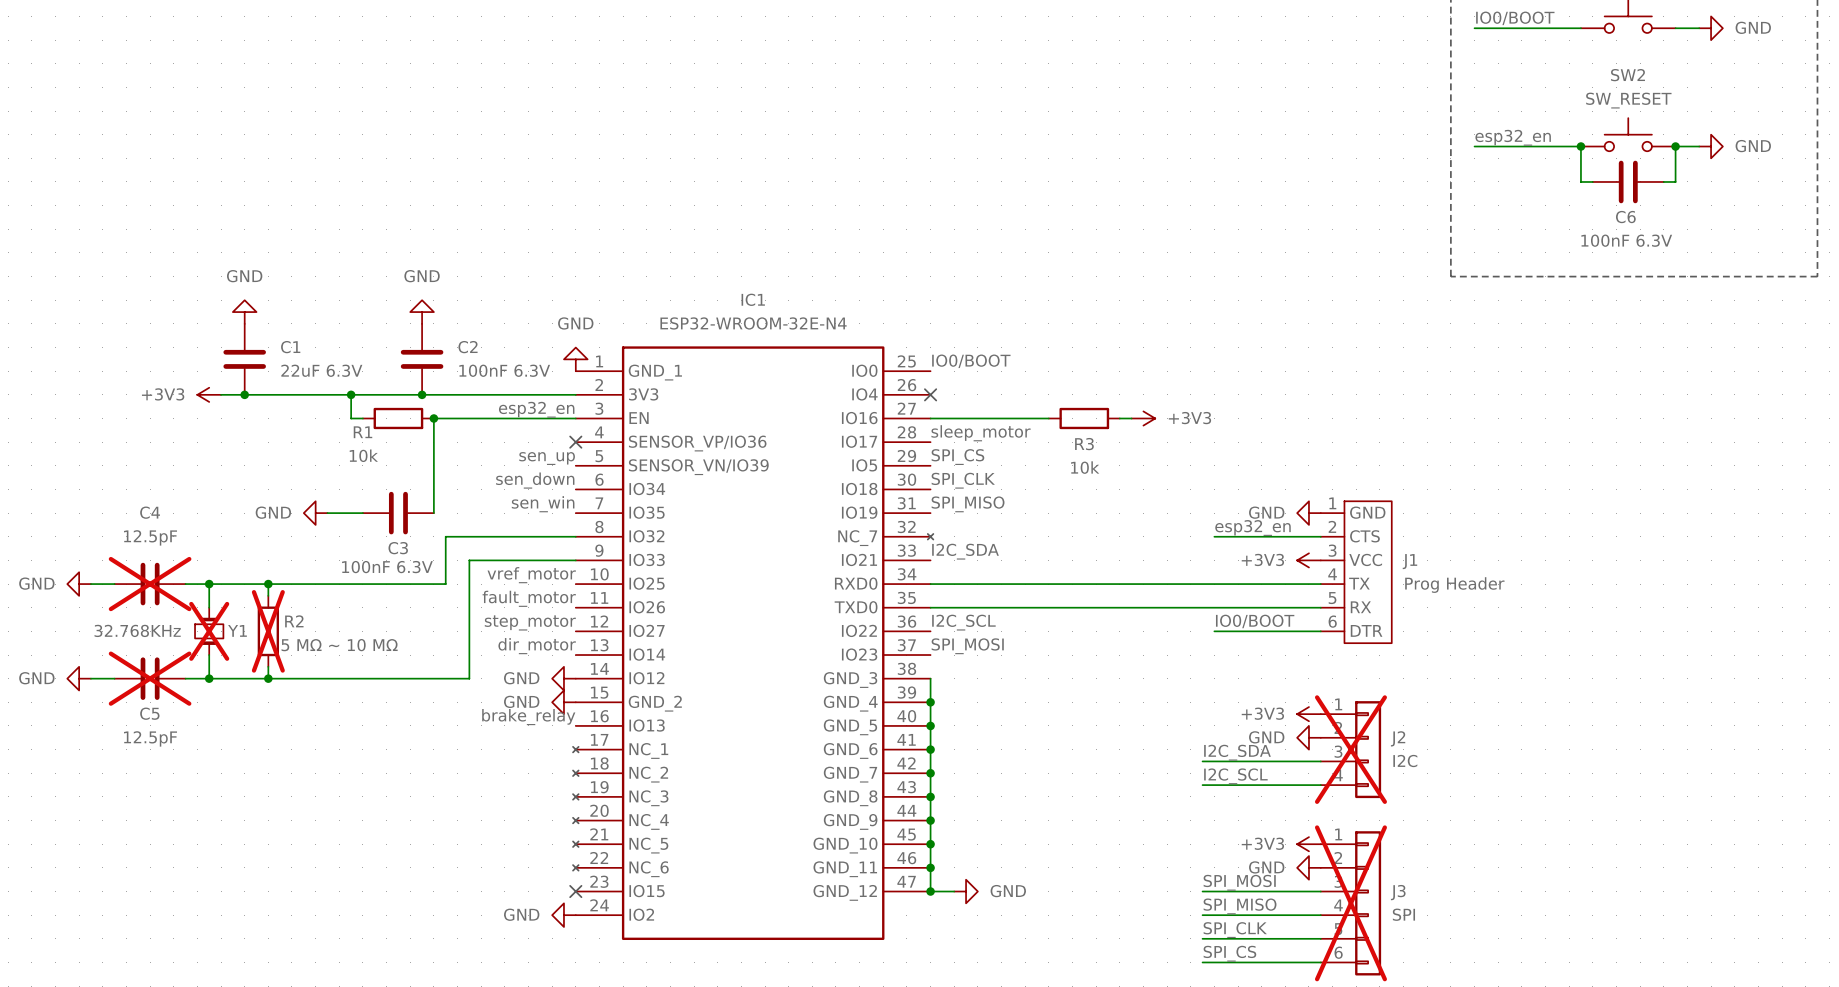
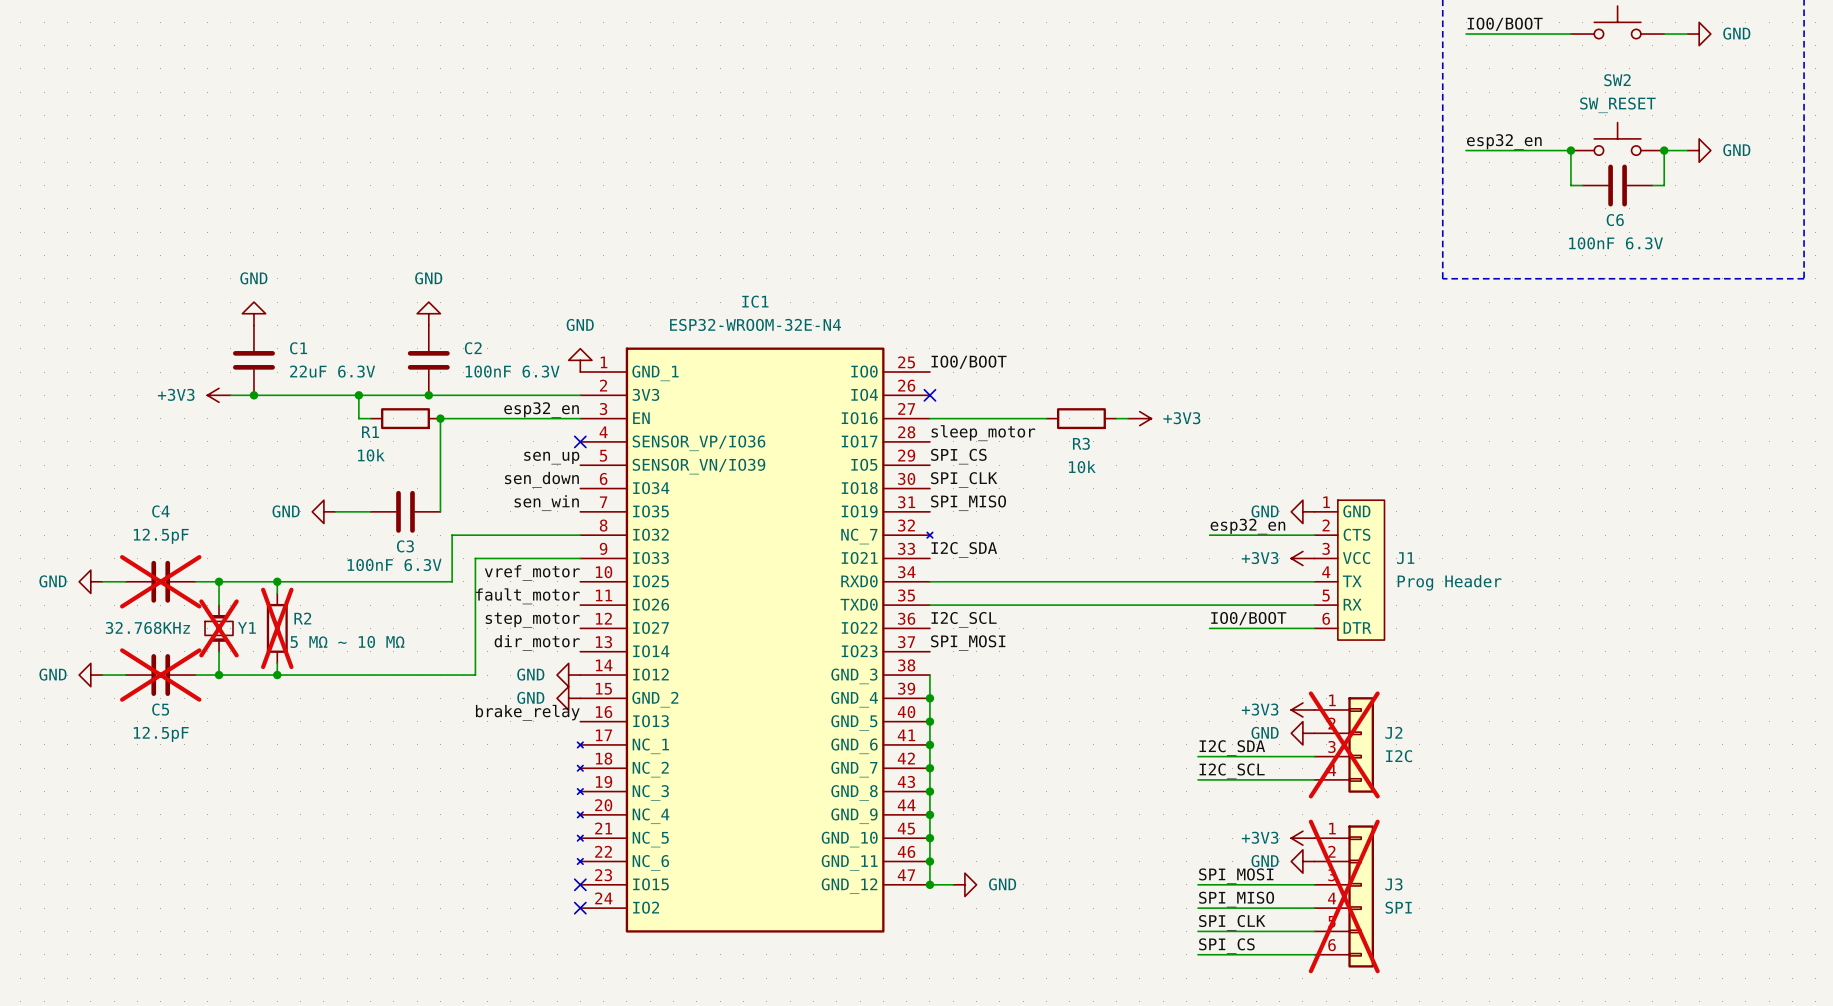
power symbol: GND (563, 915) -> none
no-connect mark: none -> (580, 908)

